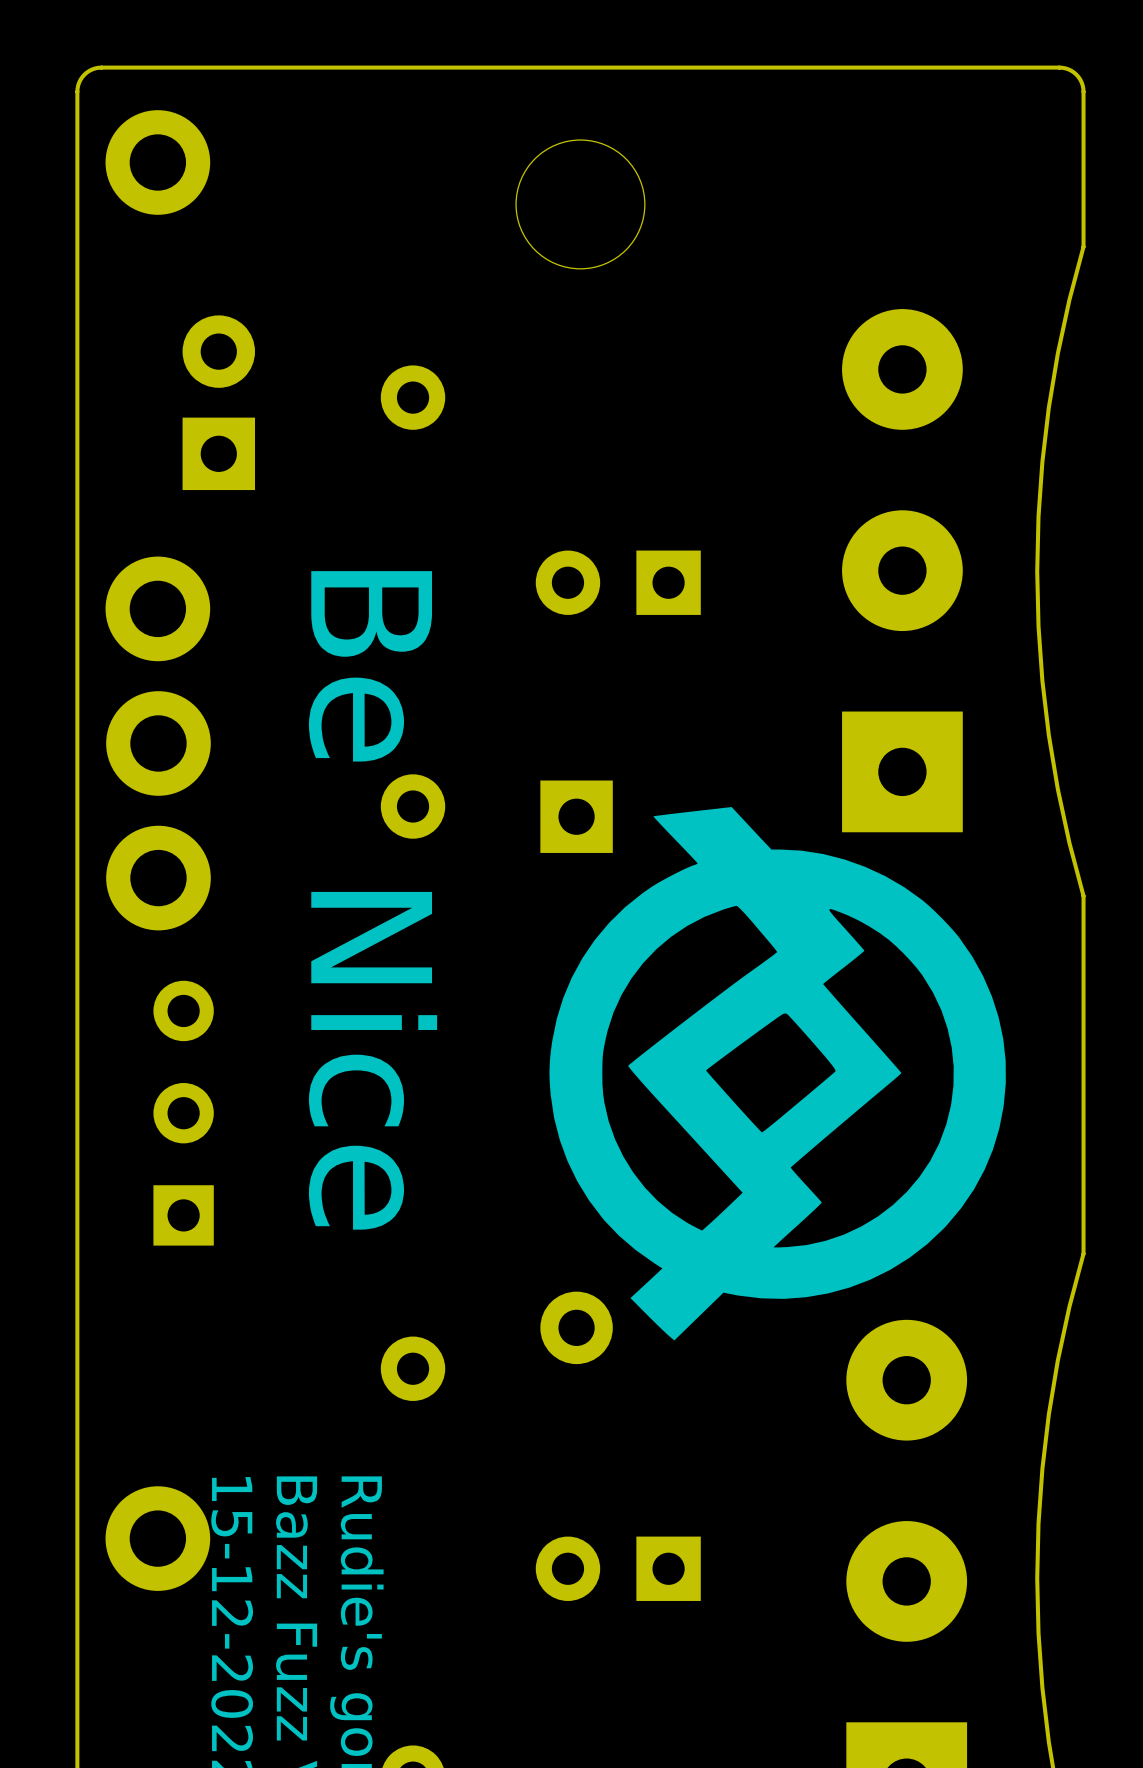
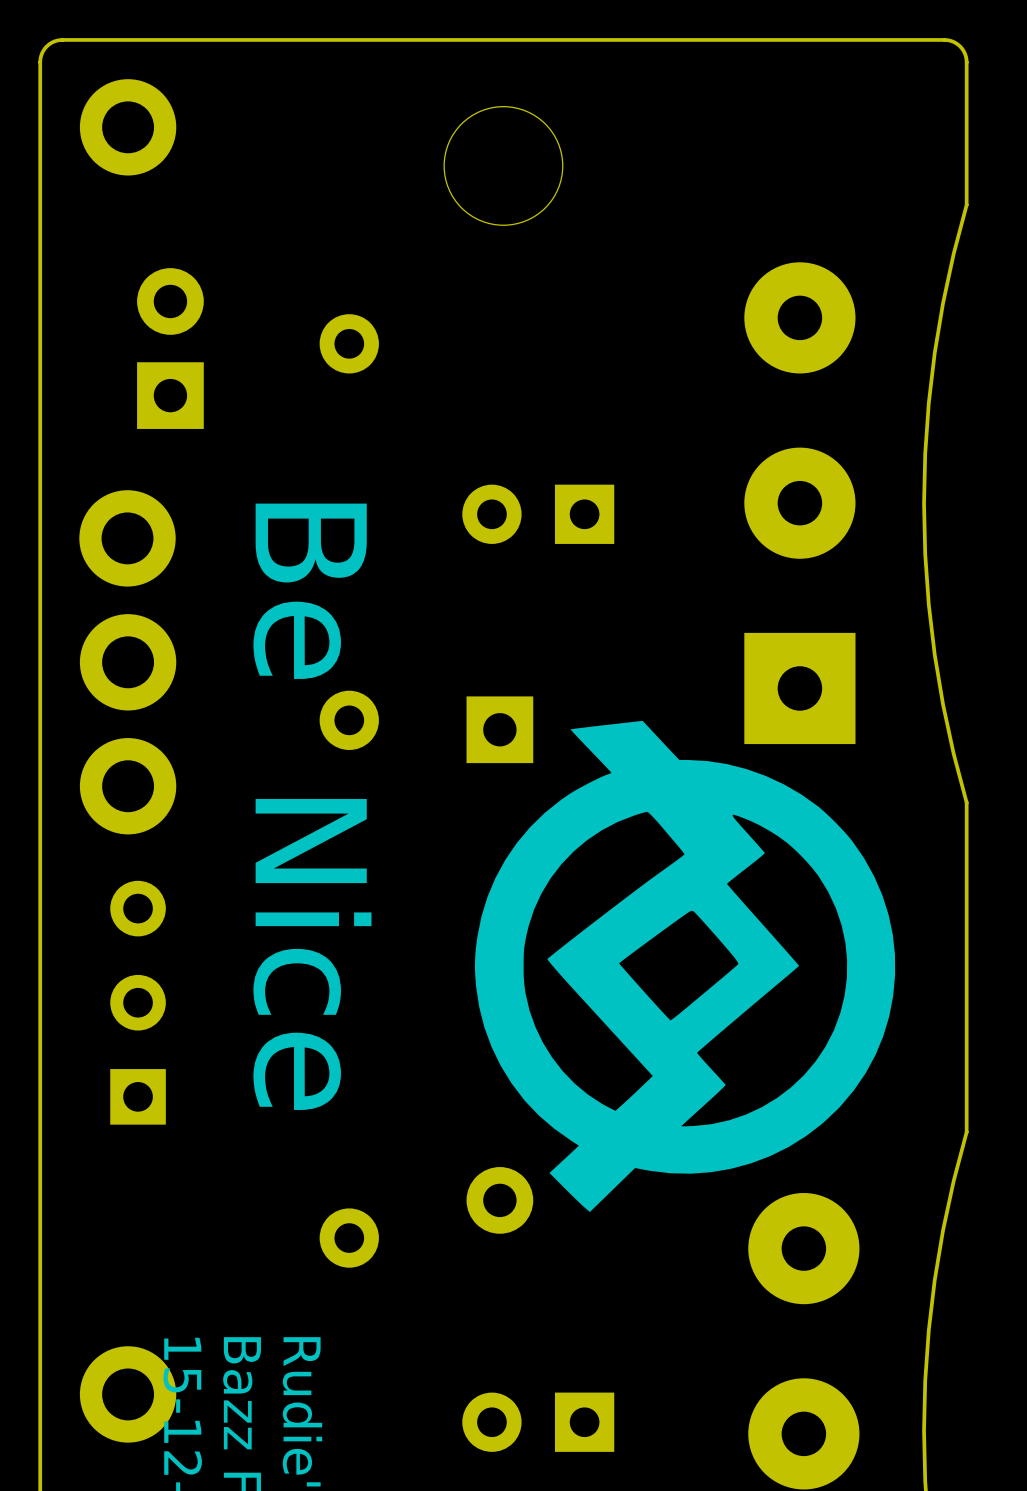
part position: (157, 162) -> (128, 127)
part position: (157, 608) -> (127, 538)
part position: (158, 743) -> (128, 662)
part position: (158, 878) -> (128, 786)
part position: (157, 1538) -> (128, 1394)

